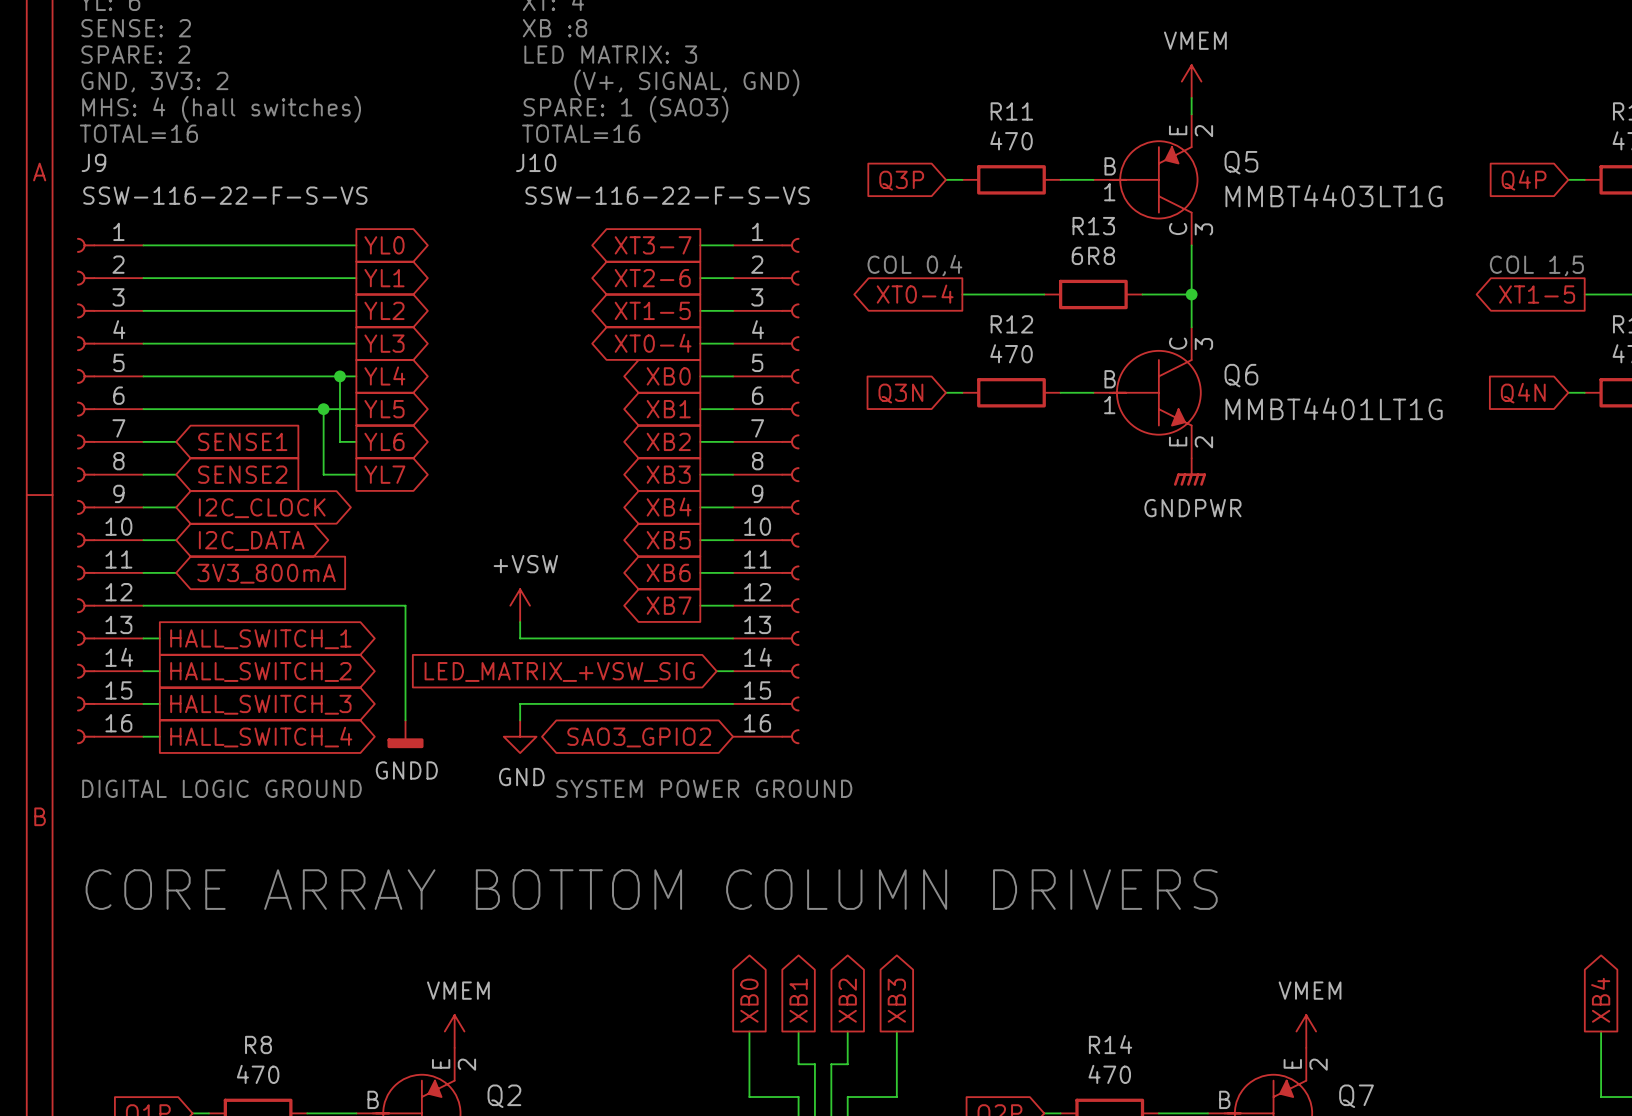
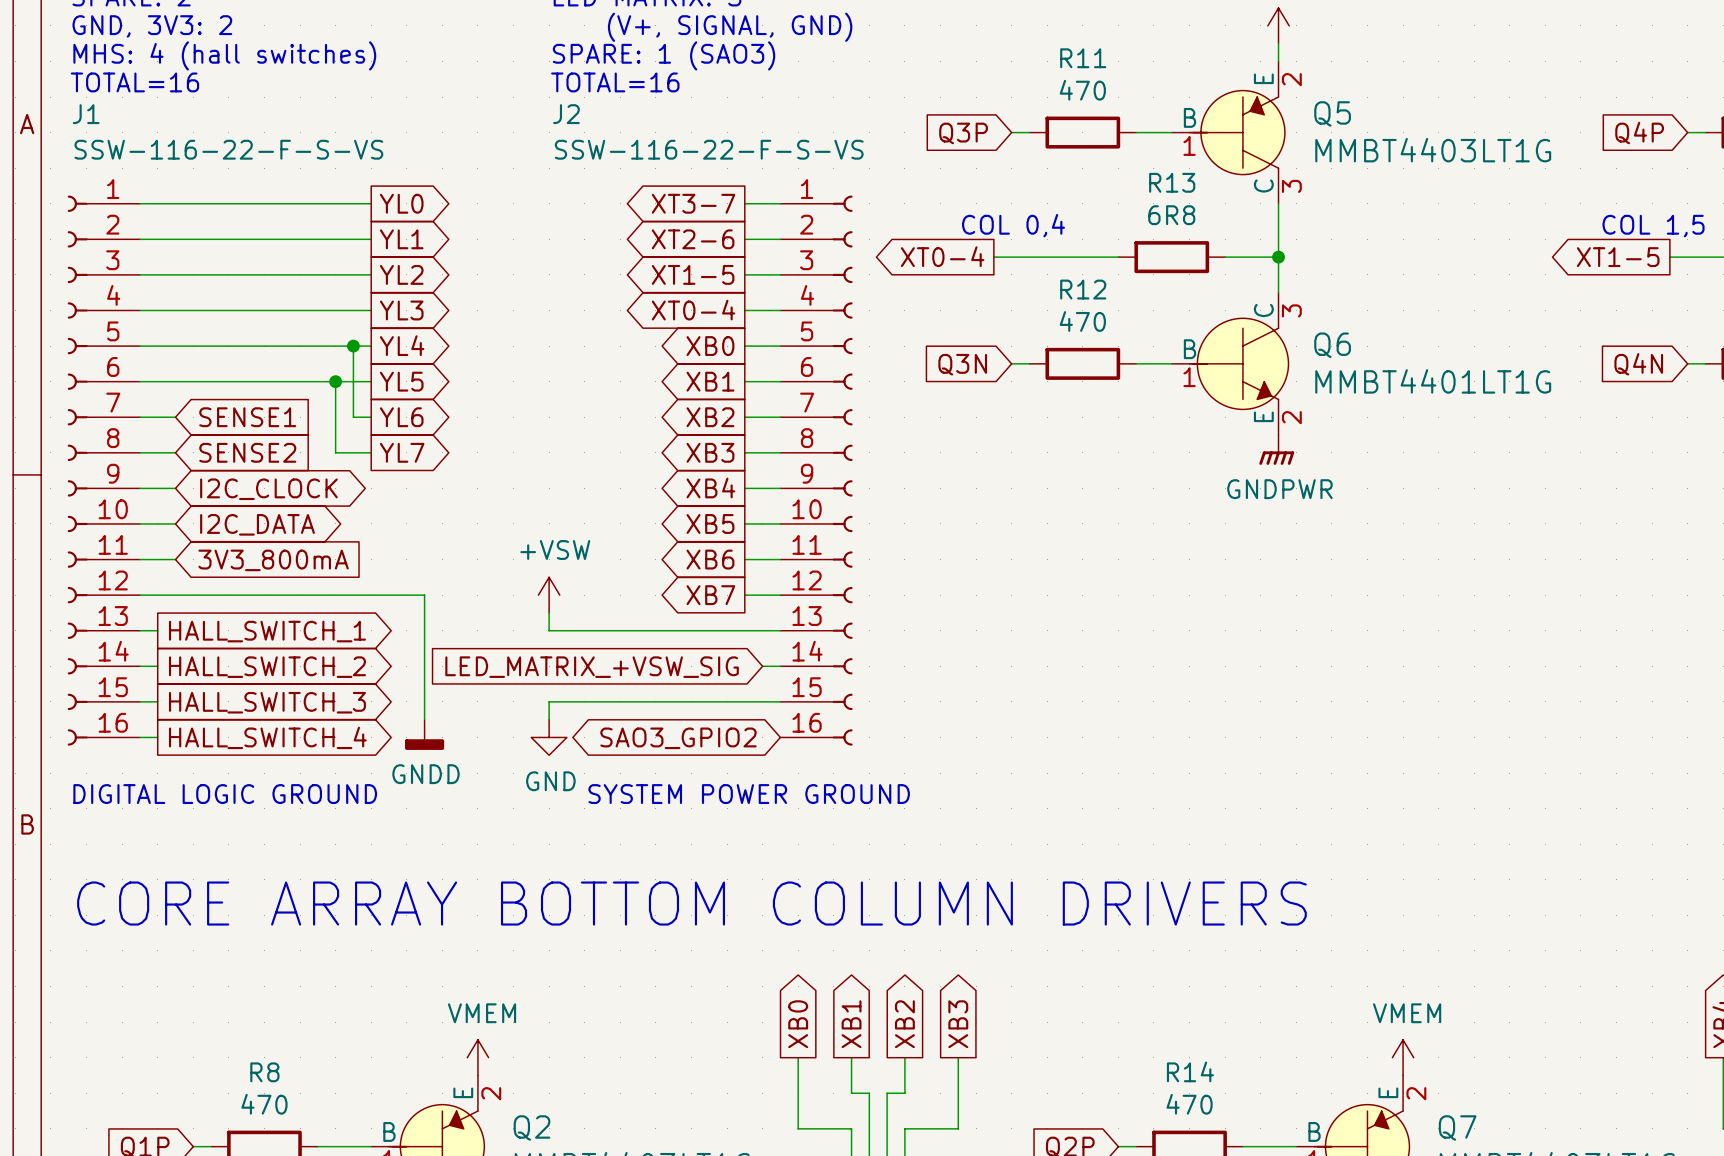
J9 name: J9 (93, 162) -> J1 (86, 114)
J10 name: J10 (536, 162) -> J2 (566, 114)
text position: COL 0,4 (914, 265) -> COL 0,4 (1013, 225)
global label position: XT0-4 (915, 294) -> XT0-4 (942, 256)
wire: none -> (993, 257) (1029, 257)
global label position: XT1-5 (1537, 294) -> XT1-5 (1618, 257)
wire: none -> (1669, 257) (1705, 257)

